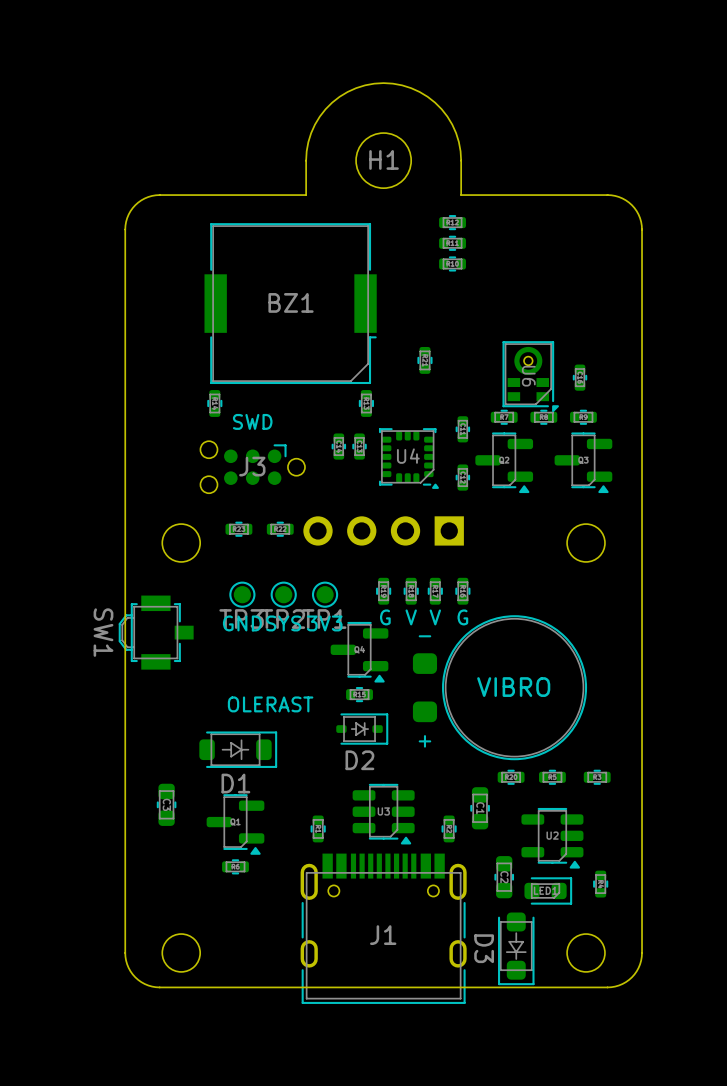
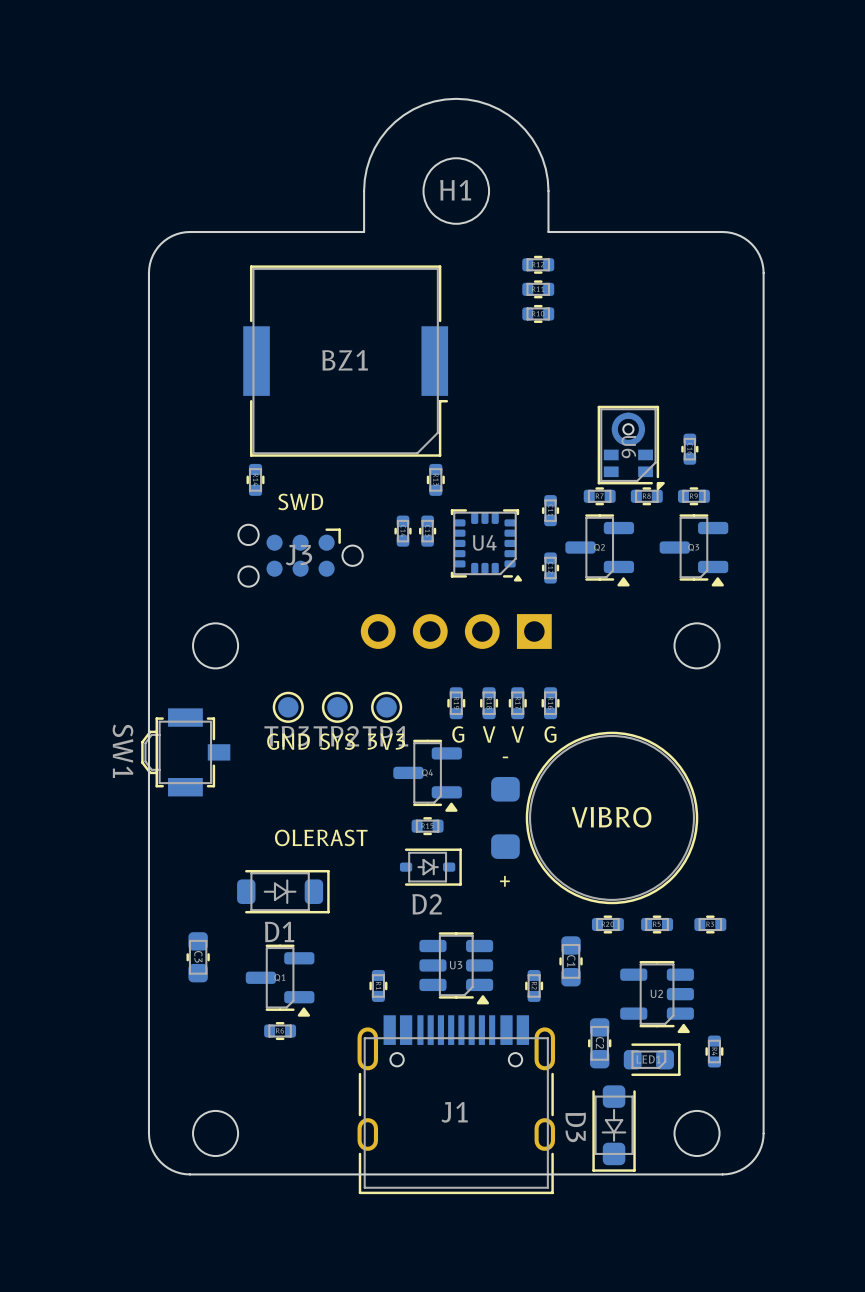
part: (424, 360) -> none
part: (238, 529) -> none
part: (280, 529) -> none

